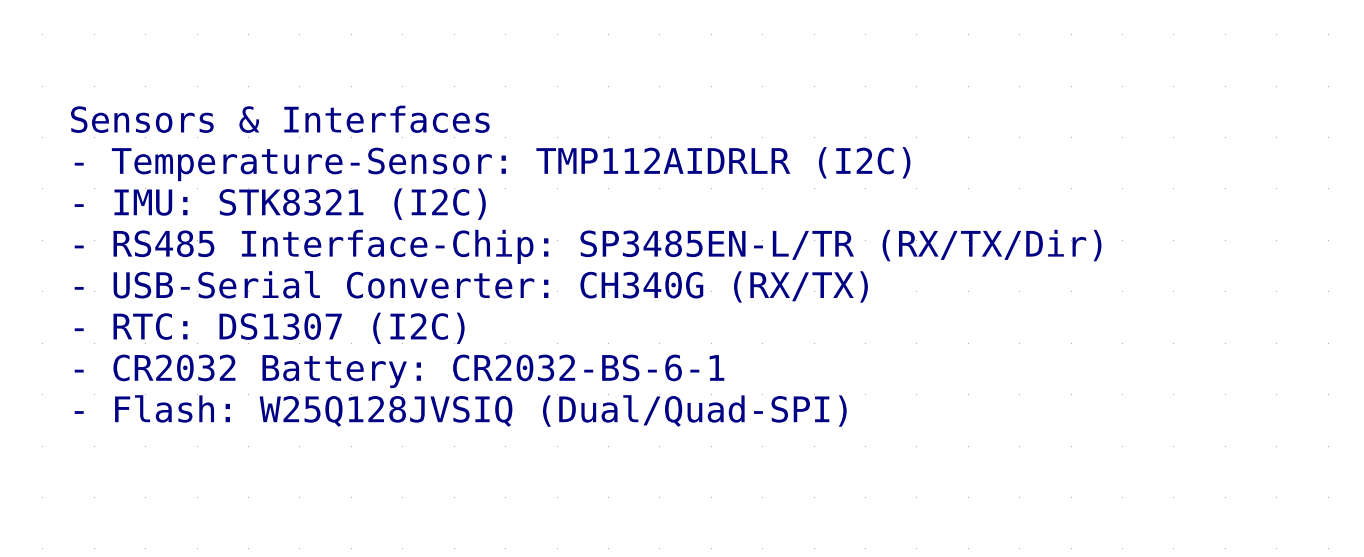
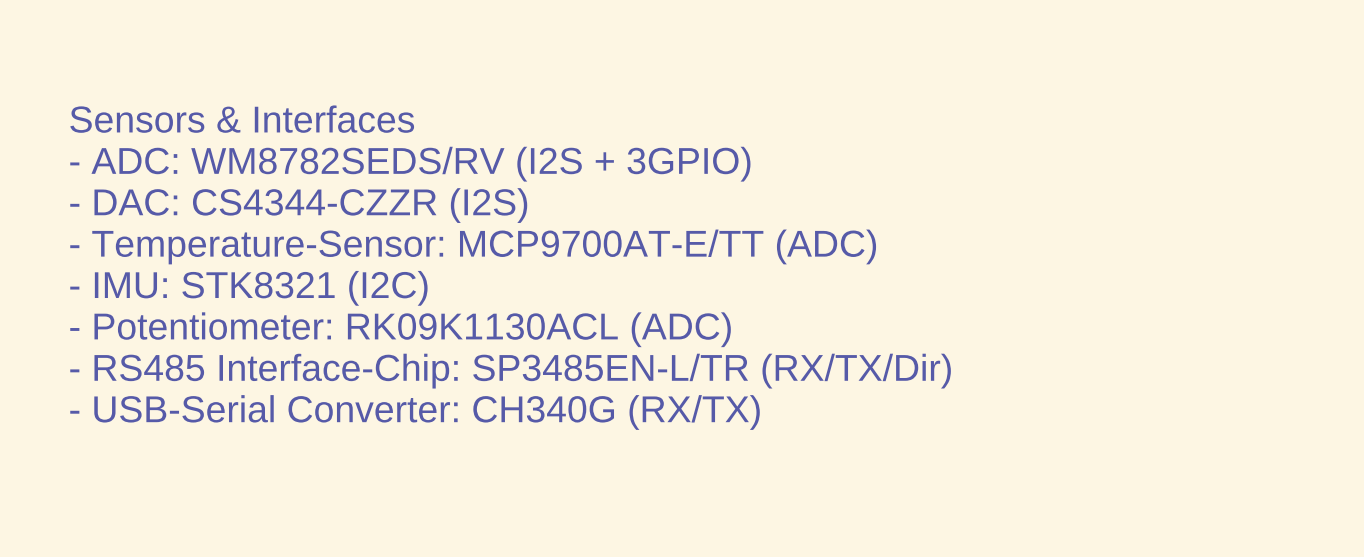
text: - Temperature-Sensor: TMP112AIDRLR (I2C) (492, 164) -> - ADC: WM8782SEDS/RV (I2S + 3GPIO) (410, 164)
text: - IMU: STK8321 (I2C) (280, 204) -> - DAC: CS4344-CZZR (I2S) (298, 205)
text: - RS485 Interface-Chip: SP3485EN-L/TR (RX/TX/Dir) (588, 246) -> - Temperature-Sensor: MCP9700AT-E/TT (ADC) (473, 246)
text: - USB-Serial Converter: CH340G (RX/TX) (471, 286) -> - IMU: STK8321 (I2C) (248, 288)
text: - RTC: DS1307 (I2C) (269, 328) -> - Potentiometer: RK09K1130ACL (ADC) (400, 329)
text: - CR2032 Battery: CR2032-BS-6-1 (399, 371) -> - RS485 Interface-Chip: SP3485EN-L/TR (RX/TX/Dir) (510, 371)
text: - Flash: W25Q128JVSIQ (Dual/Quad-SPI) (460, 411) -> - USB-Serial Converter: CH340G (RX/TX) (415, 412)

